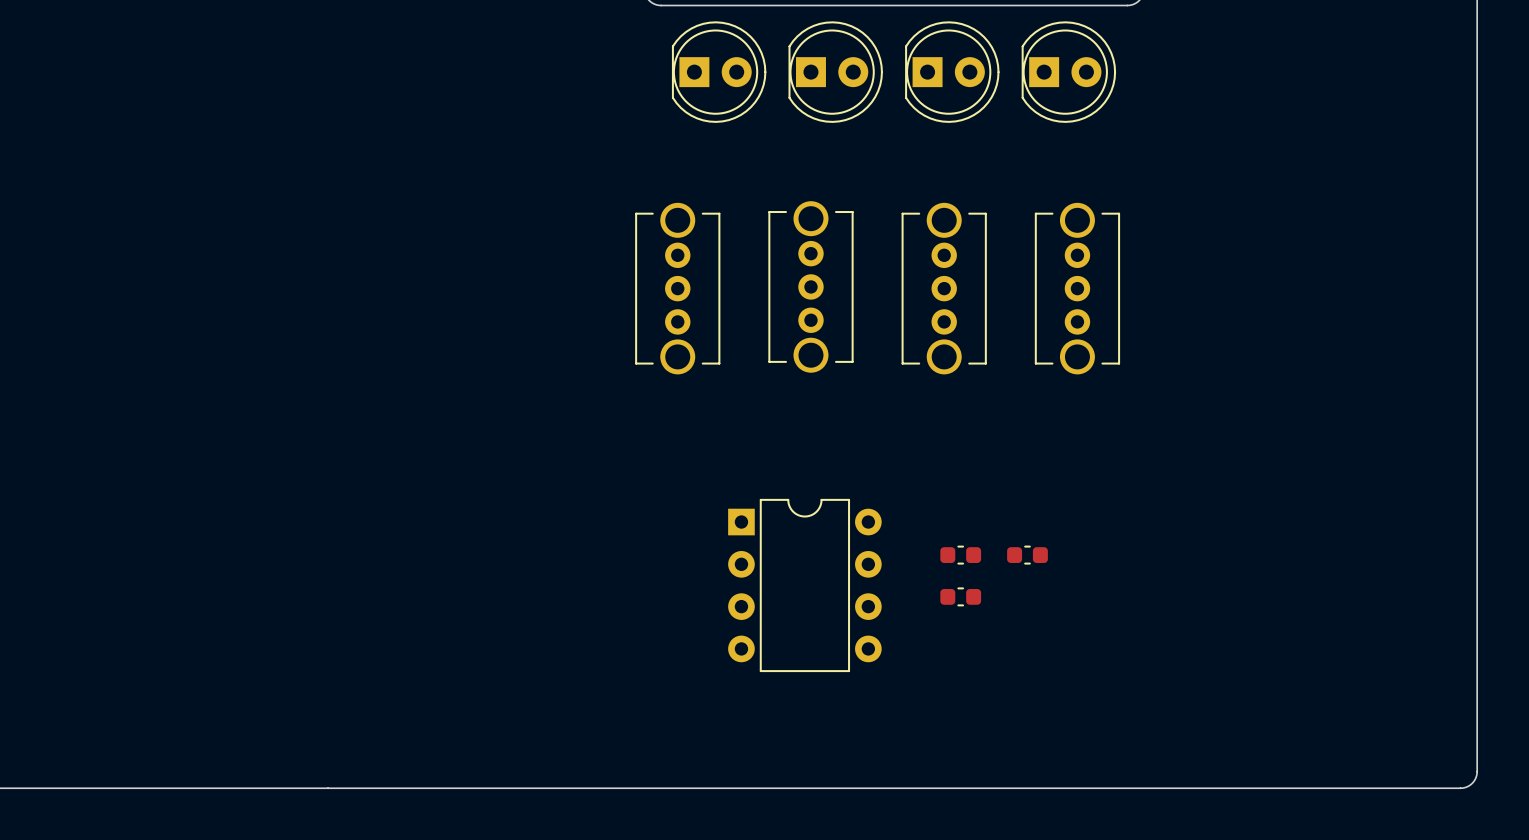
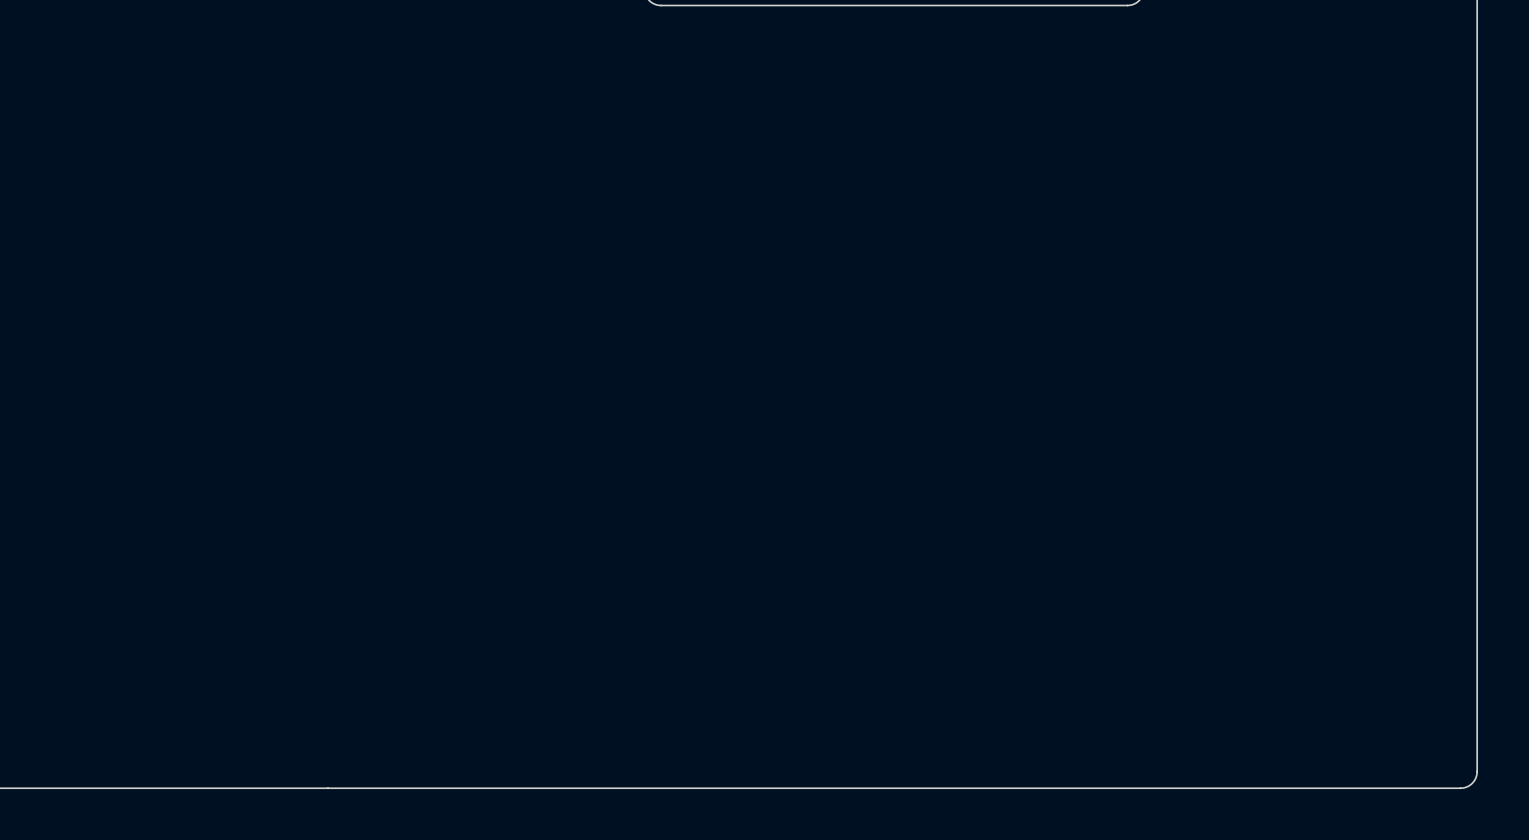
part: (719, 72) -> none
part: (835, 72) -> none
part: (952, 72) -> none
part: (1068, 72) -> none
part: (810, 286) -> none
part: (677, 288) -> none
part: (944, 288) -> none
part: (1077, 288) -> none
part: (960, 555) -> none
part: (1027, 555) -> none
part: (804, 585) -> none
part: (960, 596) -> none

